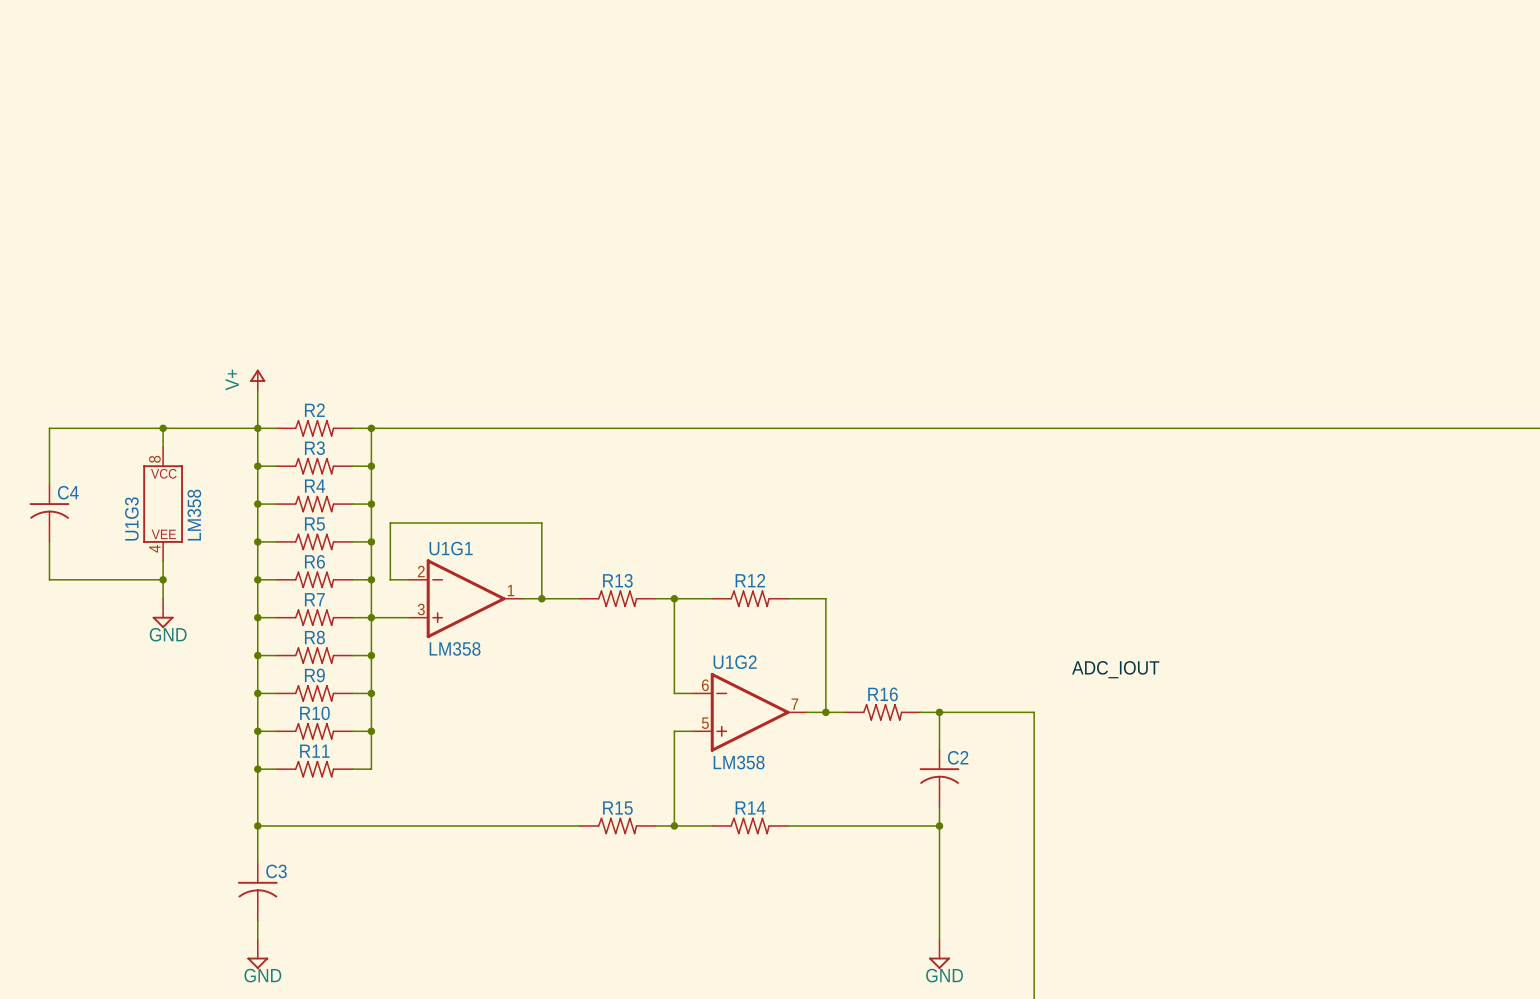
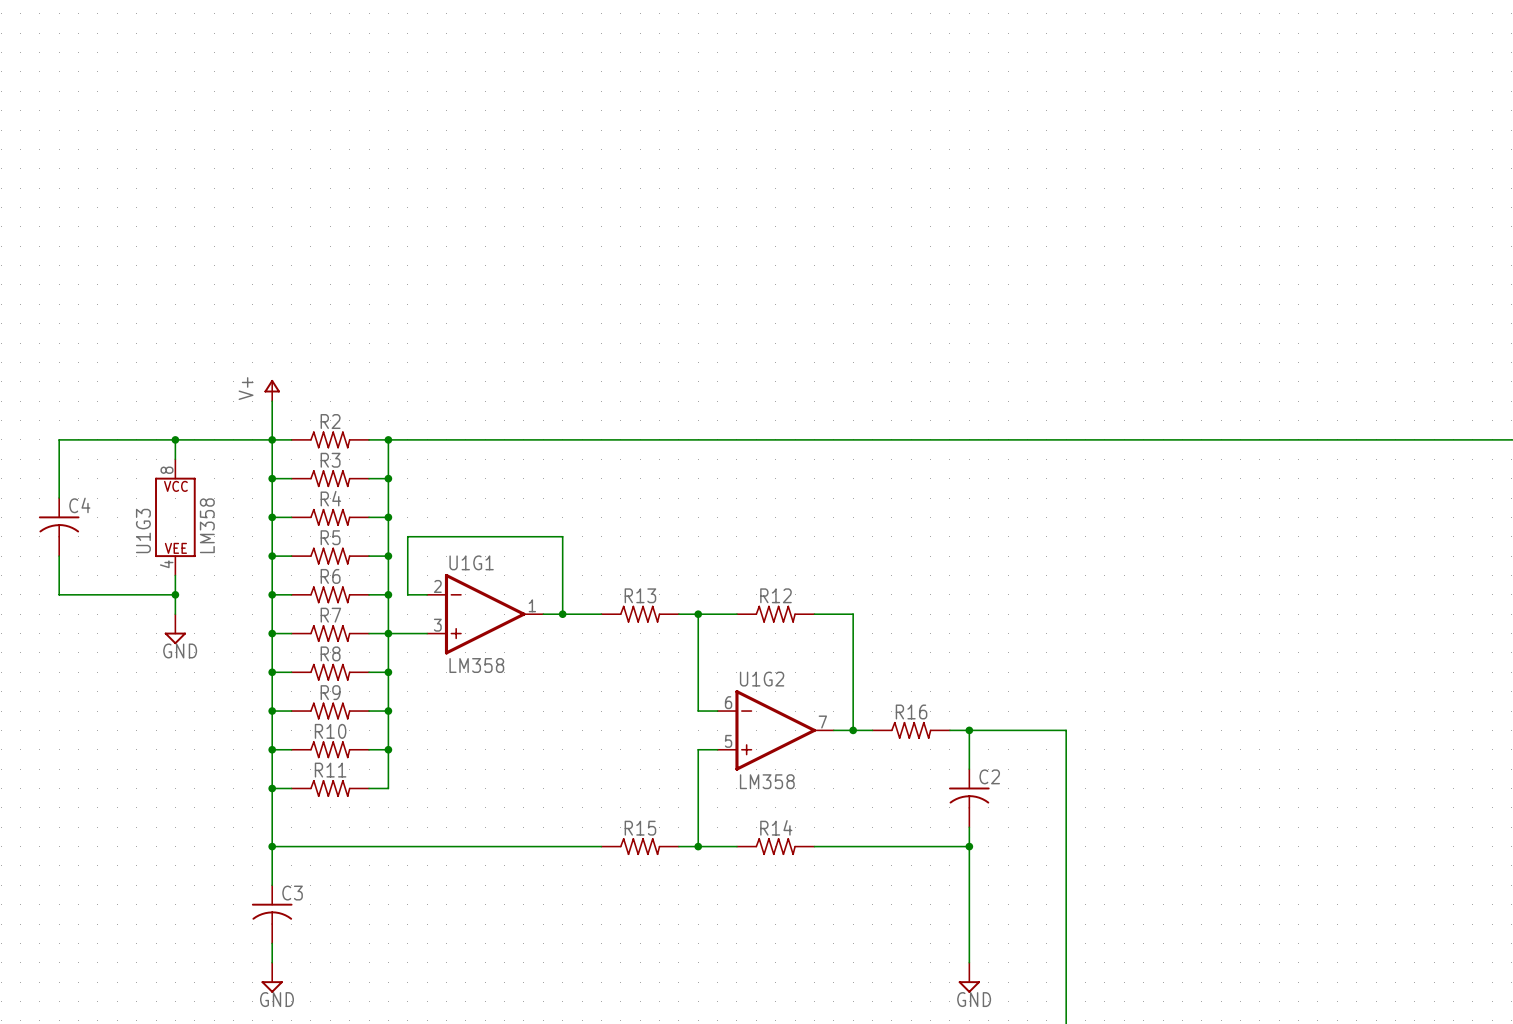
label: ADC_IOUT (1115, 669) -> none

